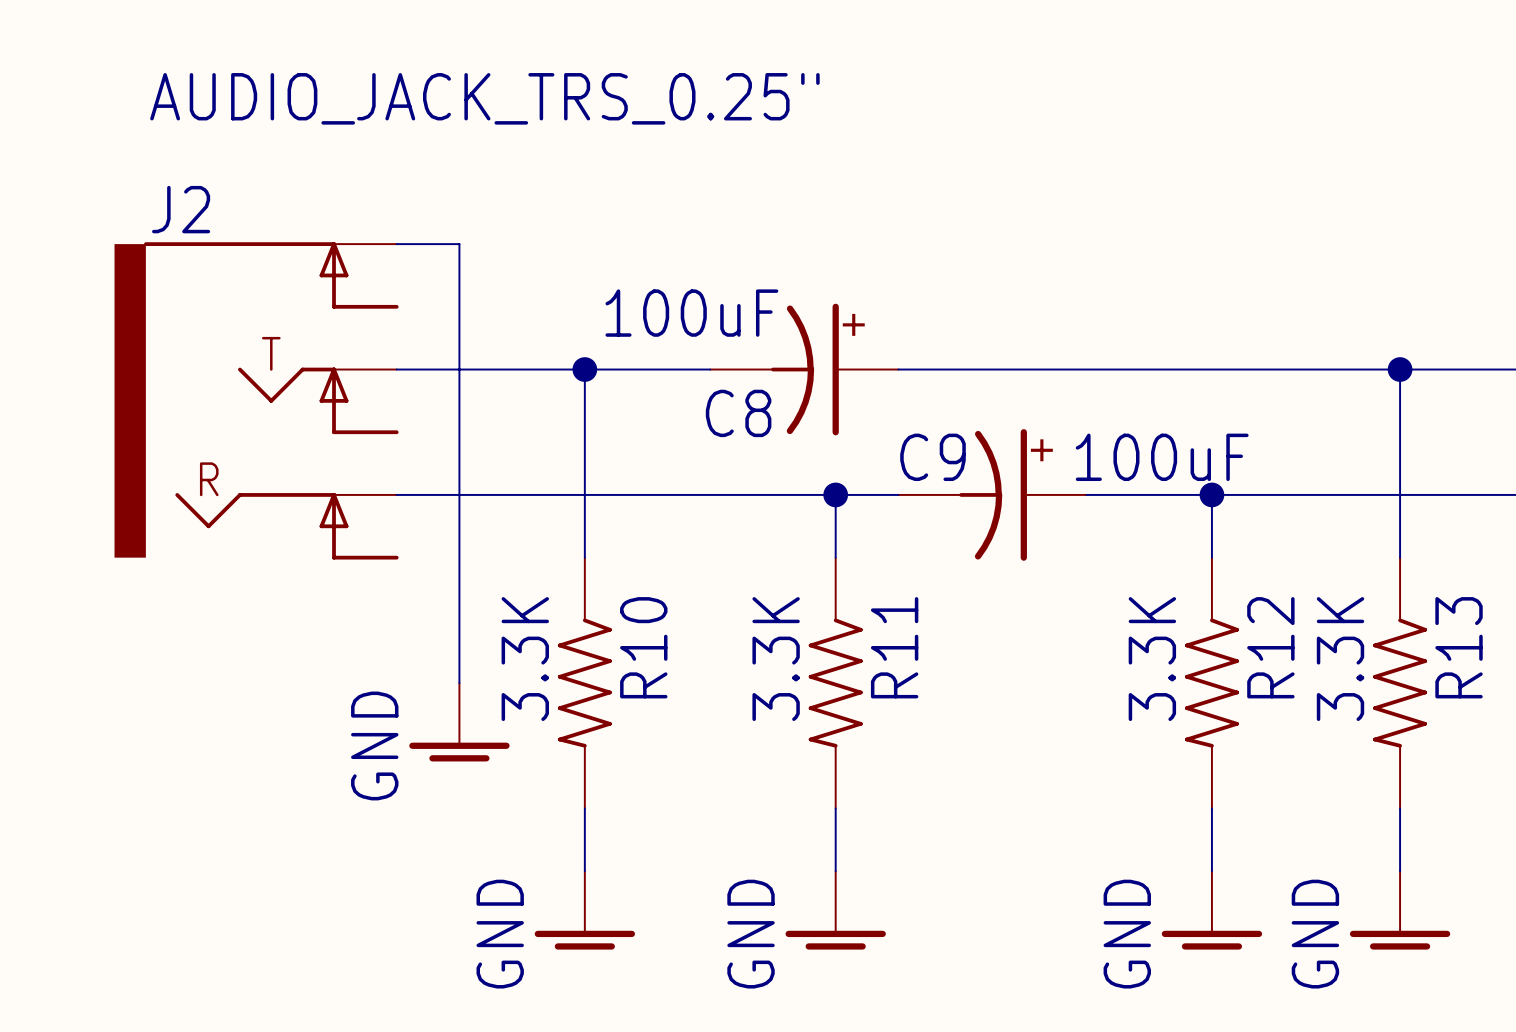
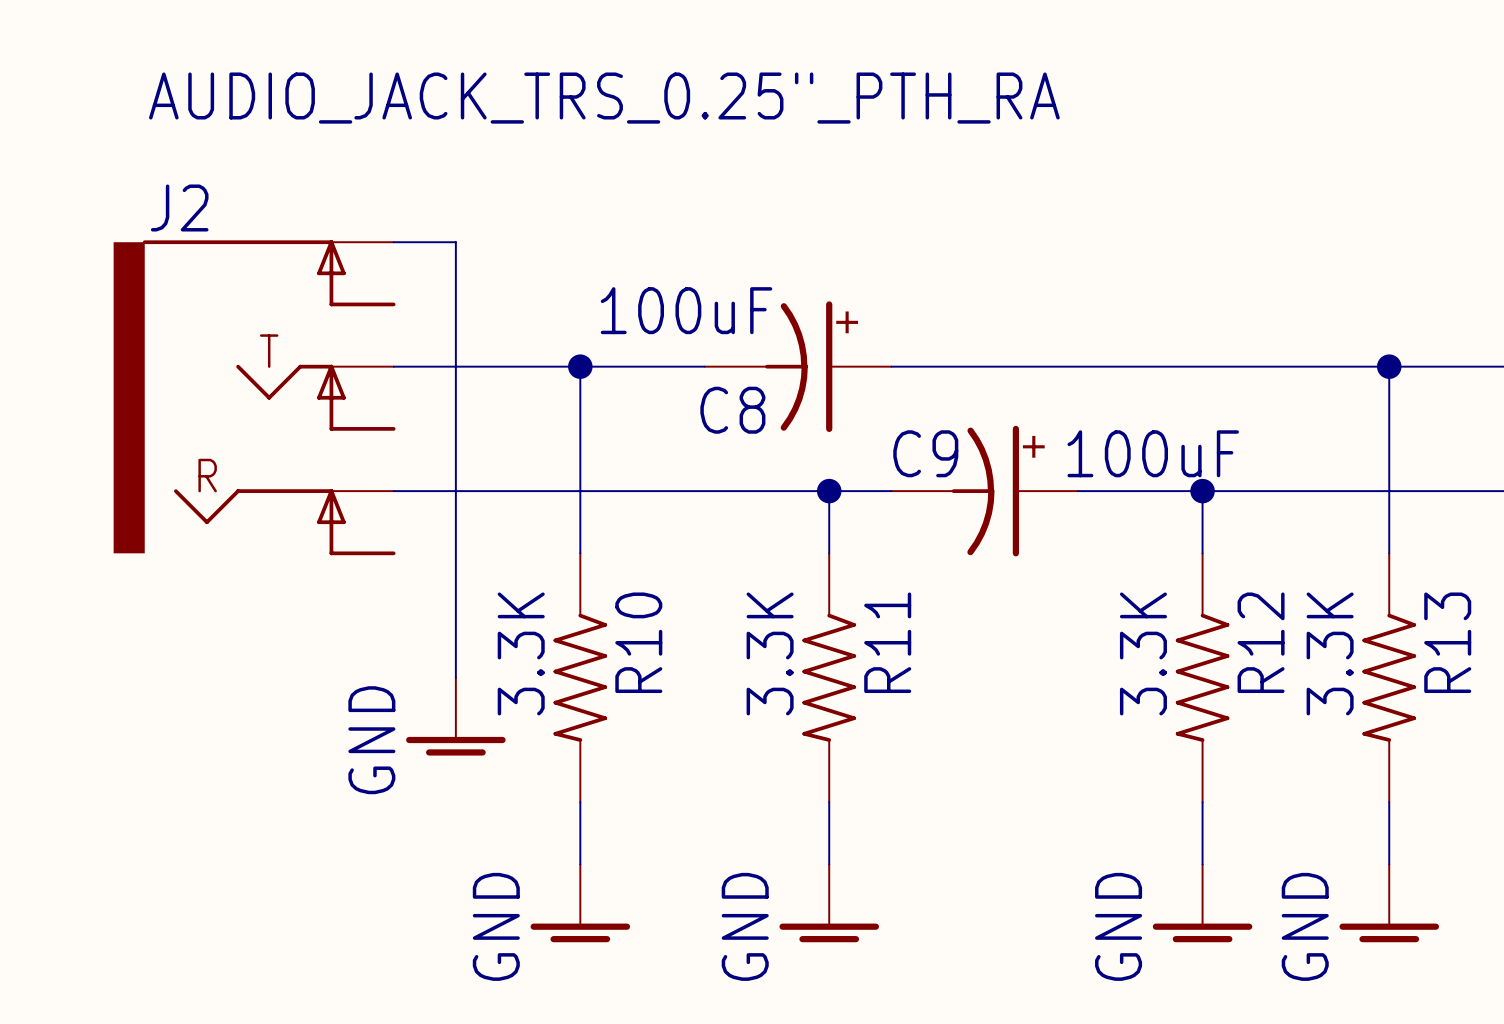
J2 value: AUDIO_JACK_TRS_0.25" (484, 98) -> AUDIO_JACK_TRS_0.25"_PTH_RA (604, 98)

